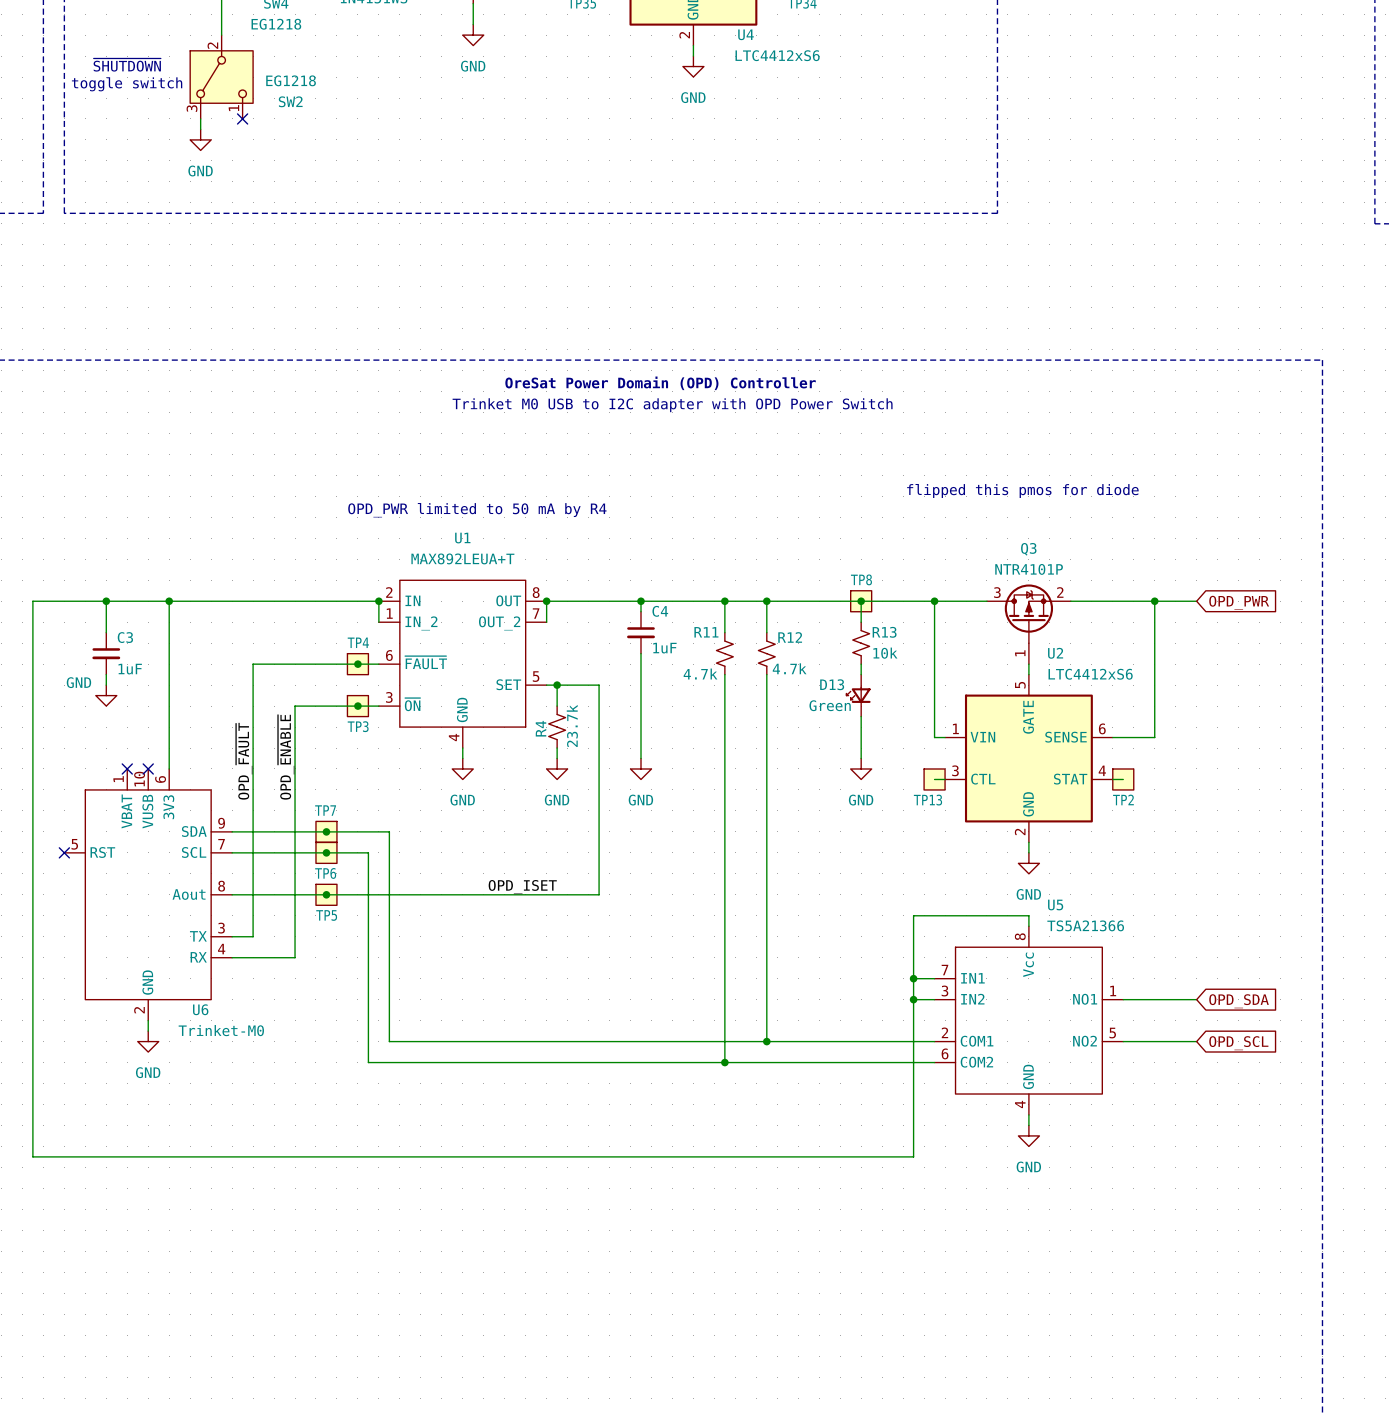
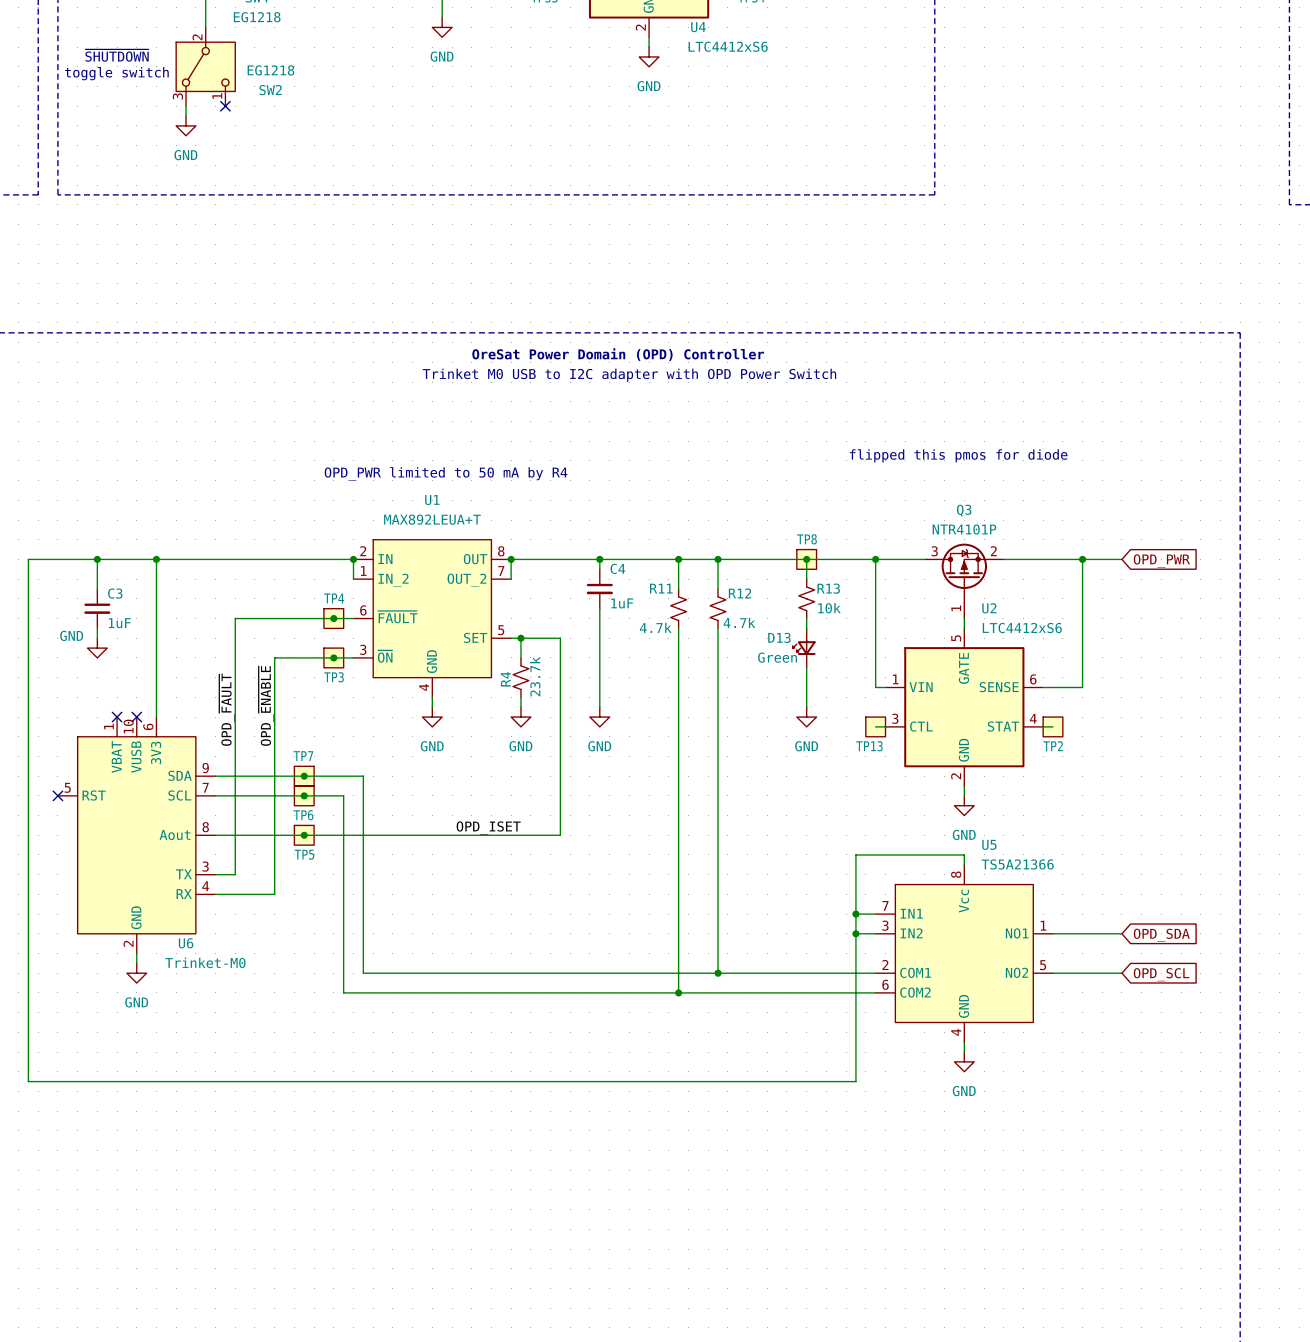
U1 symbol: [378, 579, 547, 749] -> [353, 539, 512, 698]
U6 symbol: [64, 768, 233, 1021] -> [57, 717, 216, 954]
U5 symbol: [934, 926, 1124, 1115] -> [875, 864, 1053, 1043]

